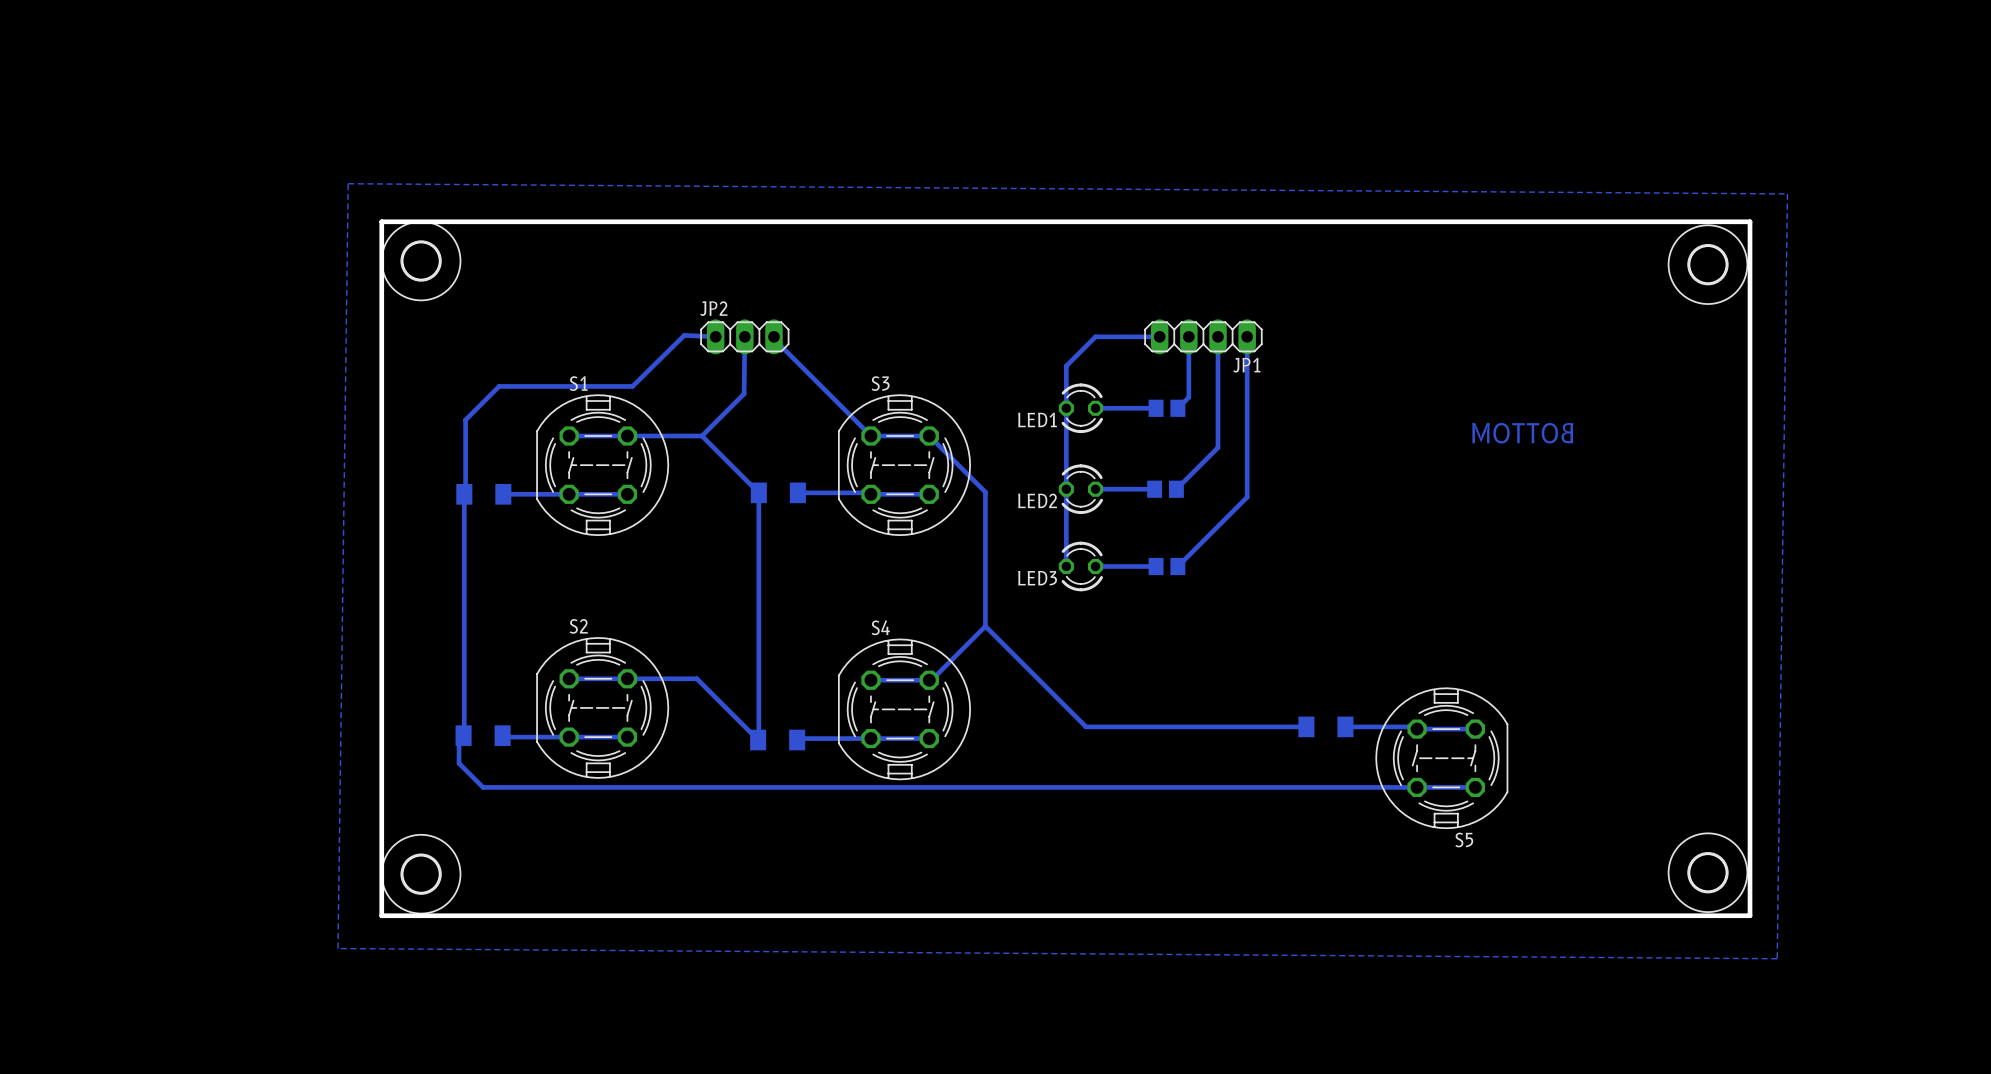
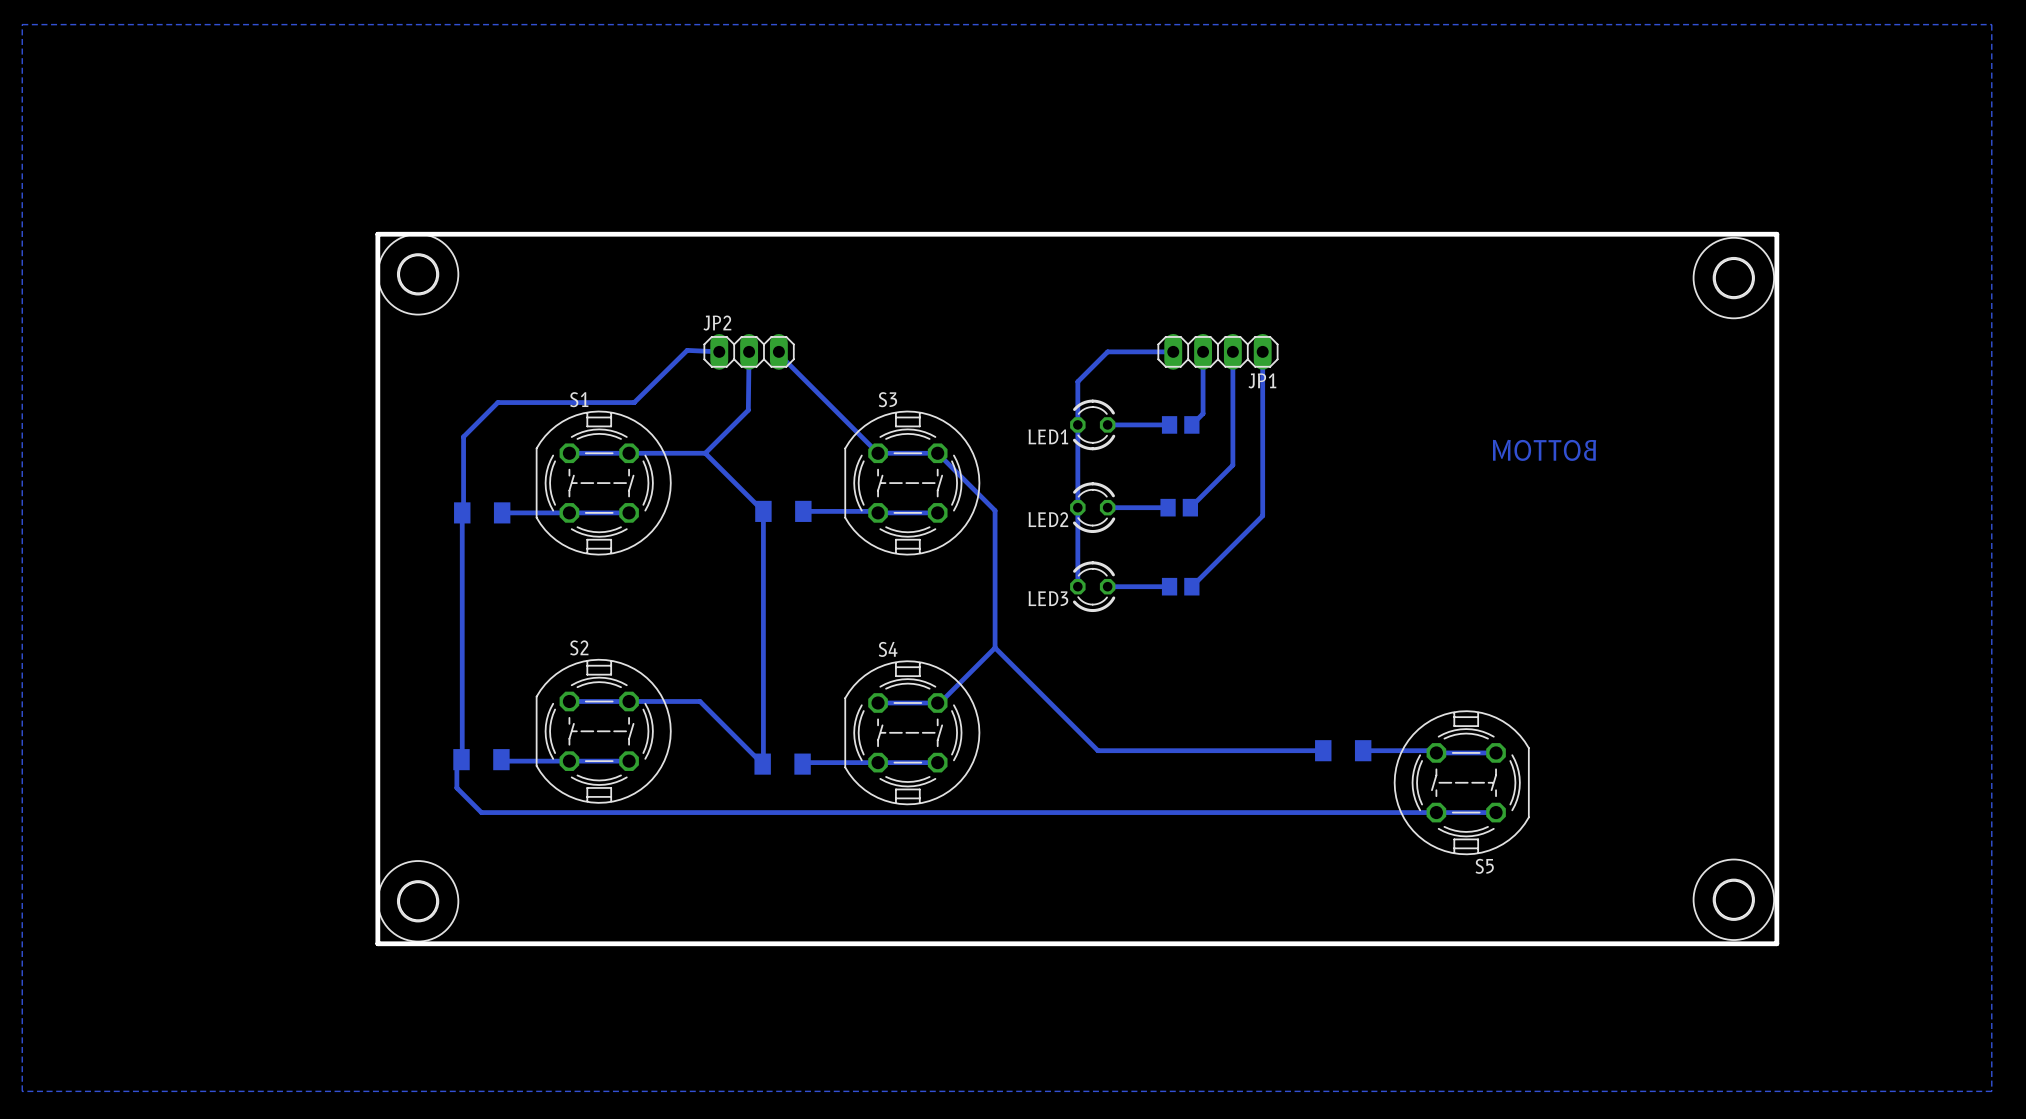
bottom zone outline: (348, 183) (1787, 193) (1777, 958) (338, 948) (348, 183) -> (22, 24) (22, 1091) (1991, 1091) (1991, 24) (22, 24)

